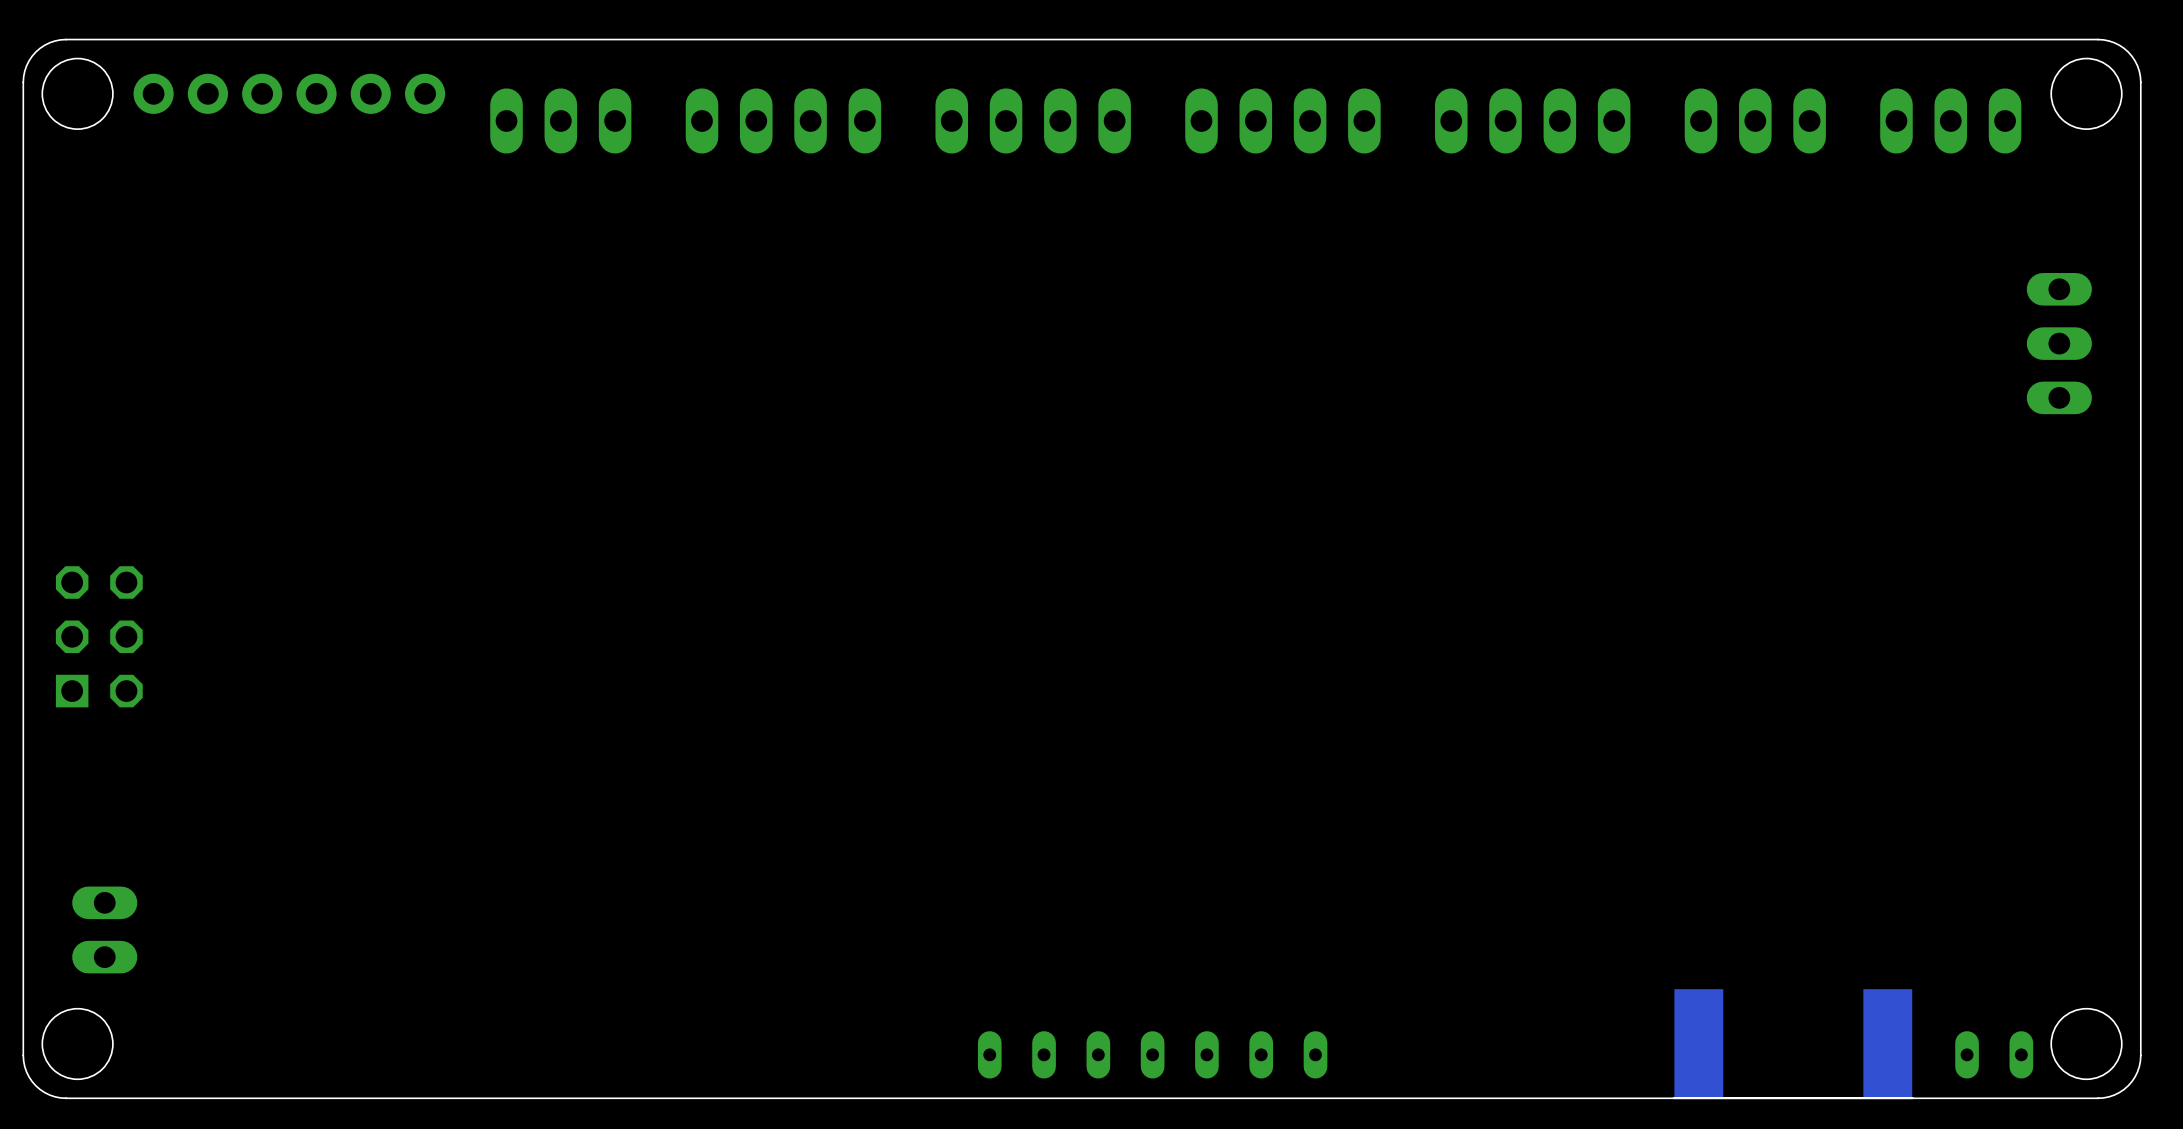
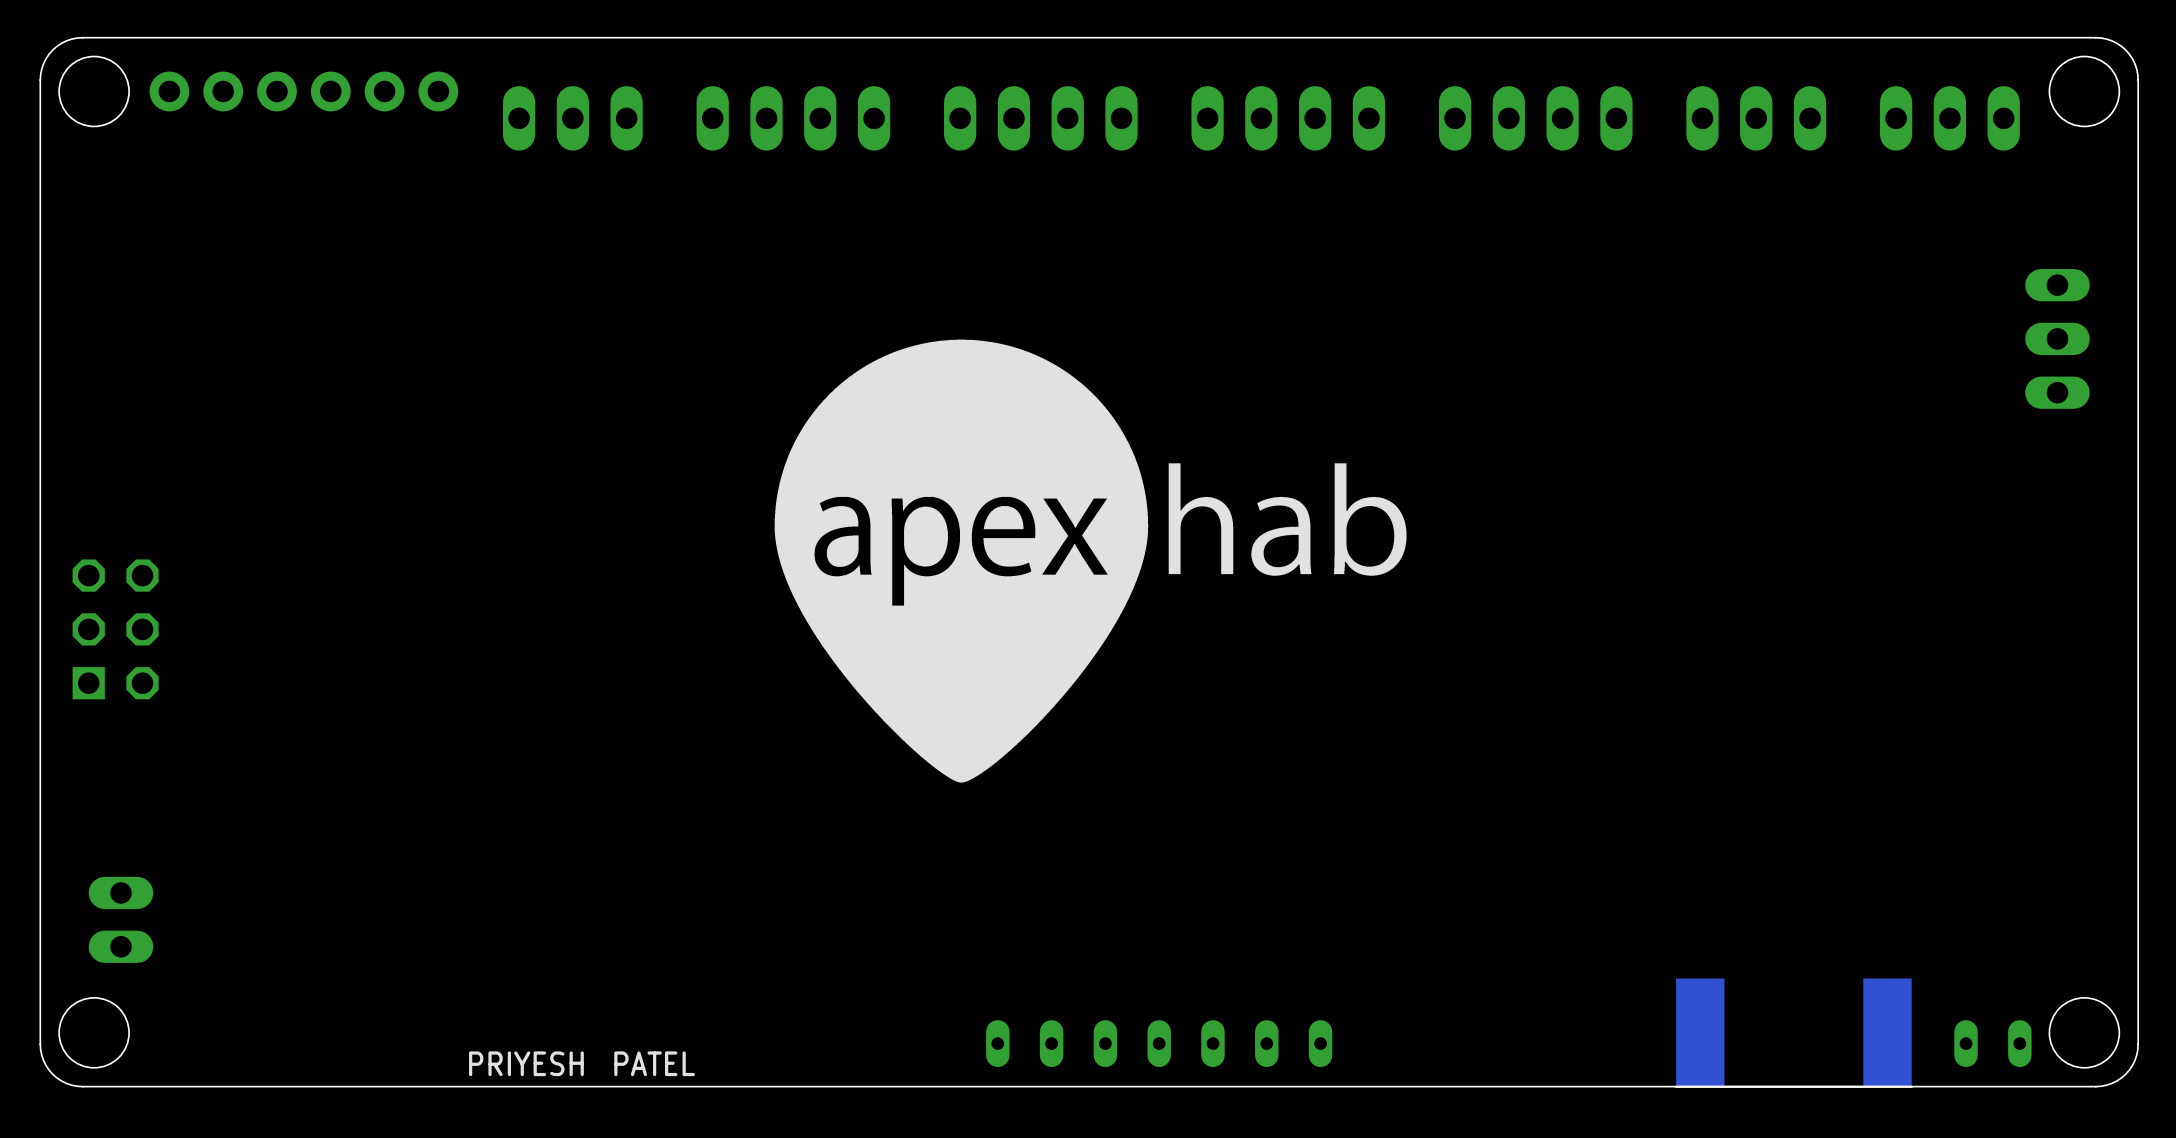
drawing: none -> [774, 339, 1407, 783]
text: none -> PRIYESH (526, 1063)
text: none -> PATEL (654, 1063)

